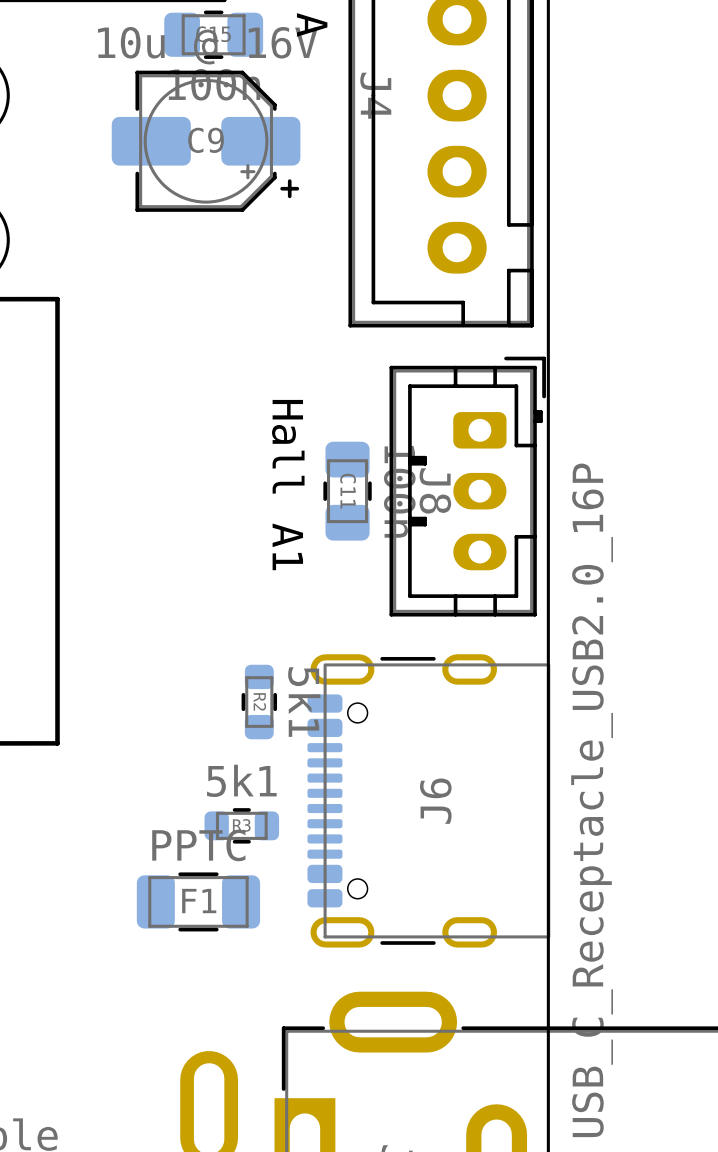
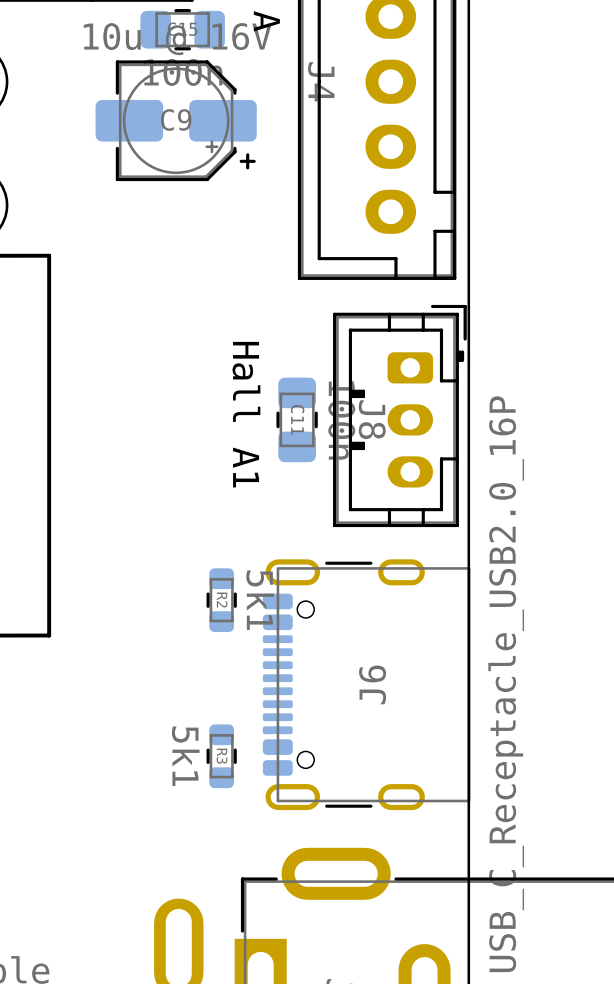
R3 value position: 5k1 (241, 780) -> 5k1 (185, 756)
R3 rotation: 0° (241, 825) -> 90° clockwise (221, 756)
R3 position: (241, 825) -> (221, 756)
F1: PPTC (198, 901) -> none

